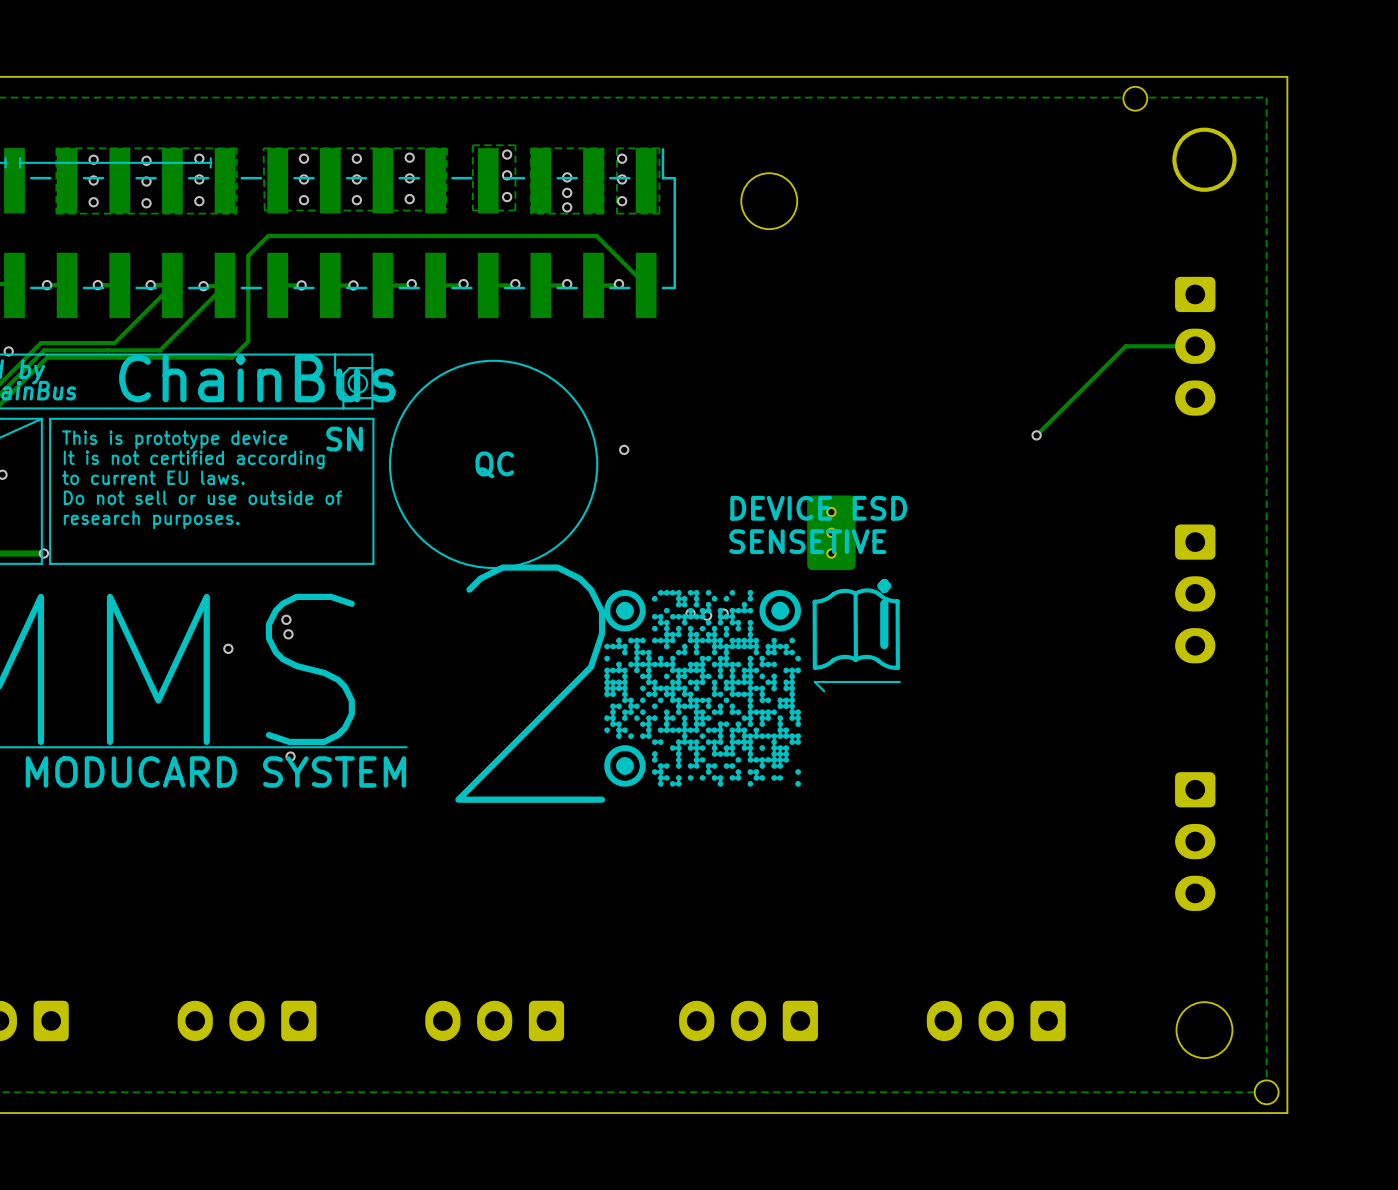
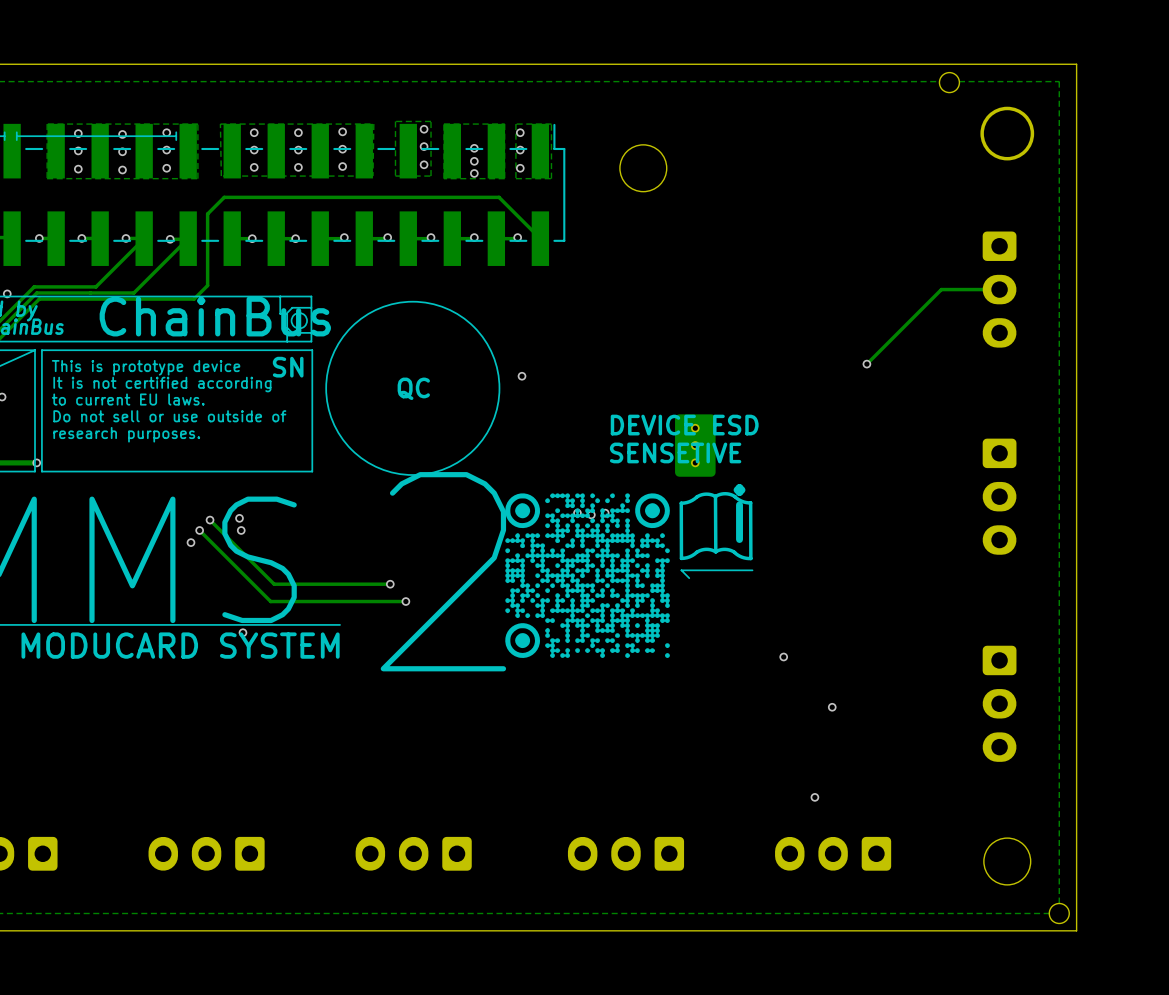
track: none -> (210, 520) (274, 584) (390, 584)
via: none -> (210, 520)
track: none -> (199, 530) (270, 601) (405, 601)
via: none -> (199, 530)
via: none -> (390, 584)
via: none -> (405, 601)
via: none -> (783, 656)
via: none -> (832, 707)
via: none -> (814, 797)

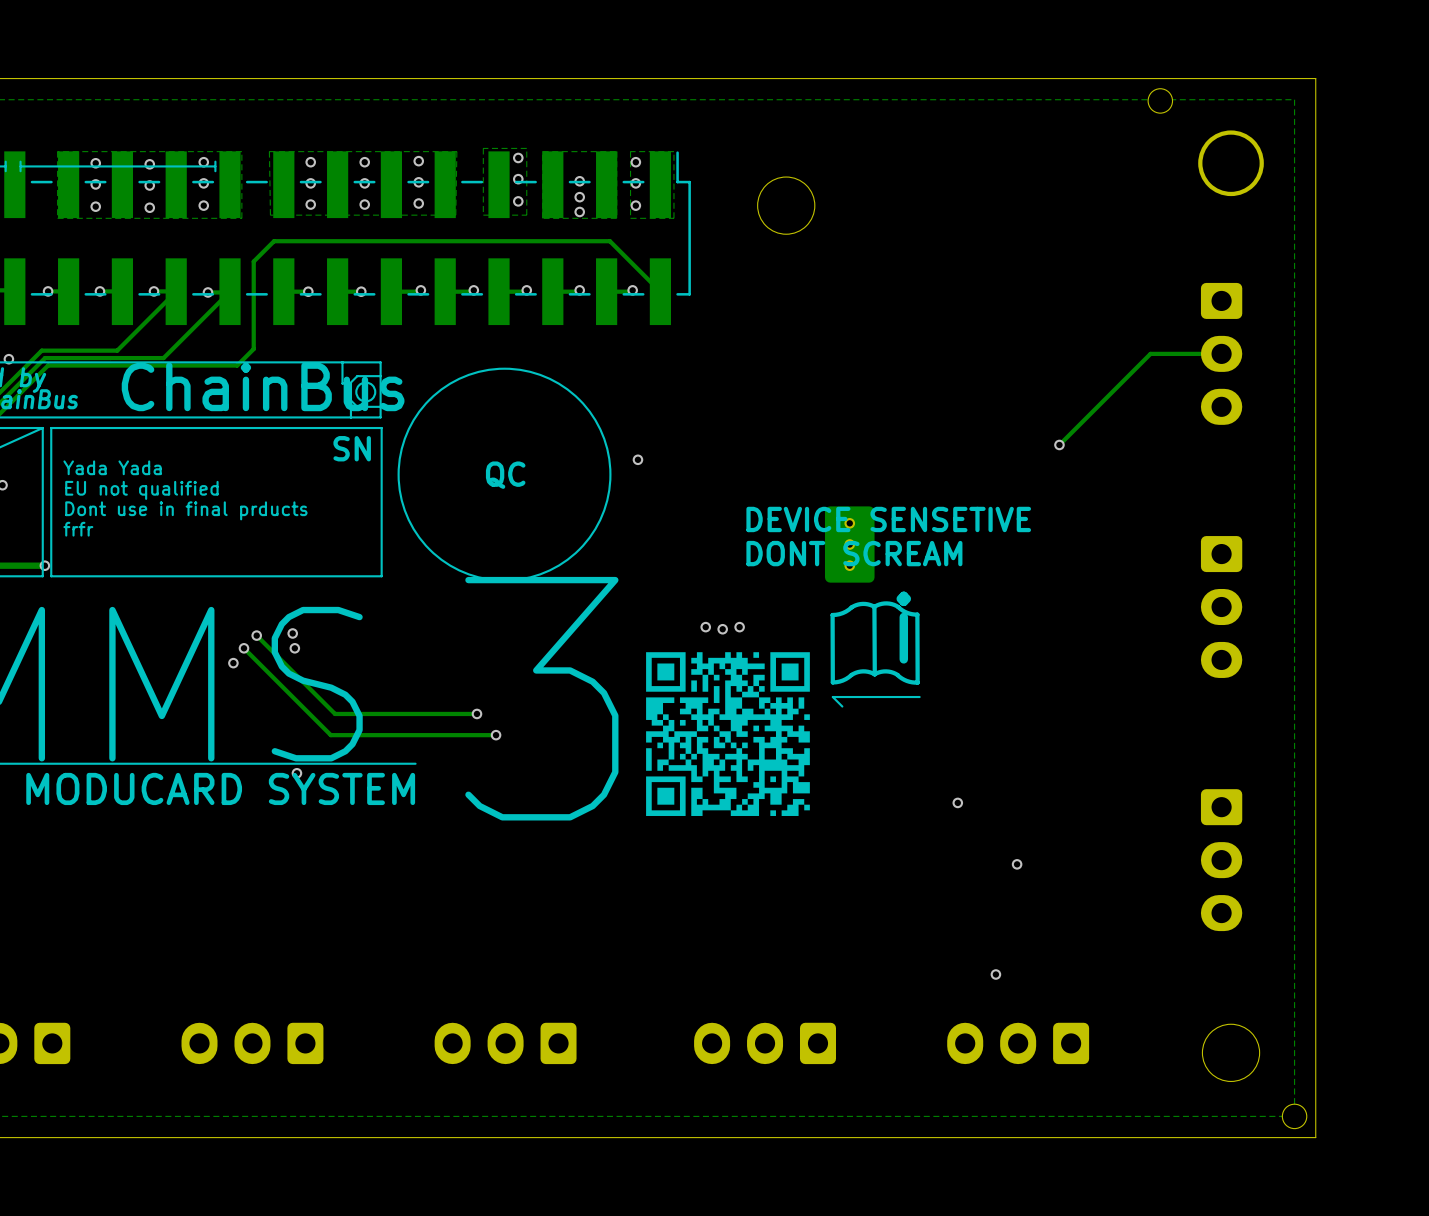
text: This is prototype device (146, 367) -> none
text: It is not certified according (162, 384) -> Yada Yada (112, 467)
text: to current EU laws. (128, 399) -> EU not qualified (141, 490)
text: Do not sell or use outside of (169, 416) -> Dont use in final prducts (186, 510)
text: DEVICE ESD (684, 425) -> DEVICE SENSETIVE (888, 519)
text: research purposes. (126, 434) -> frfr (78, 529)
text: SENSETIVE (675, 452) -> DONT SCREAM (854, 553)
drawing: [505, 493, 670, 658] -> none
drawing: none -> [646, 652, 810, 816]
text: 2 (443, 571) -> 3 (541, 698)

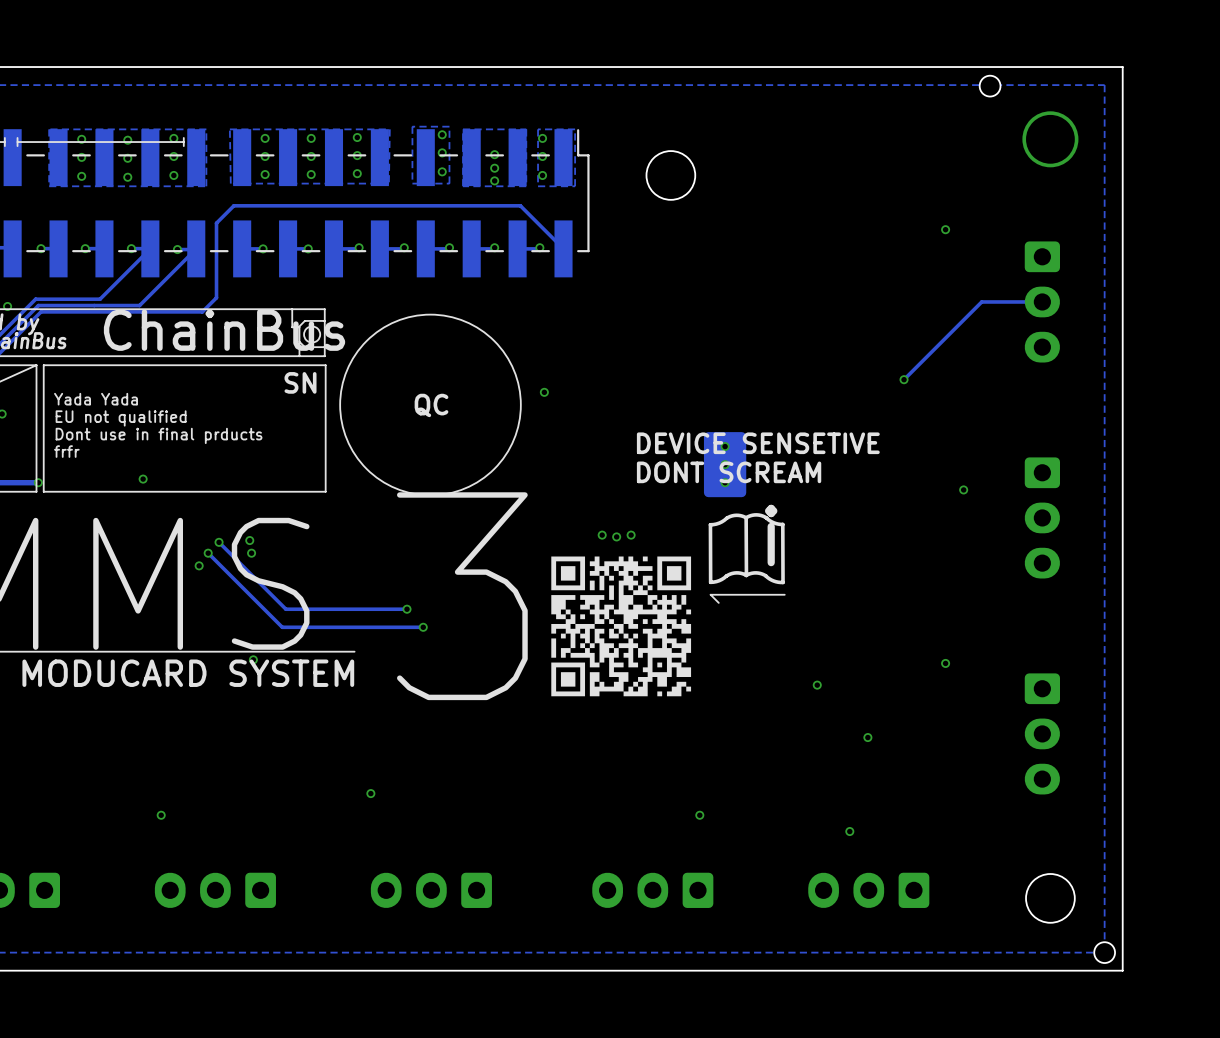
via: none -> (945, 229)
via: none -> (143, 479)
via: none -> (963, 489)
via: none -> (945, 663)
via: none -> (370, 793)
via: none -> (161, 815)
via: none -> (699, 815)

